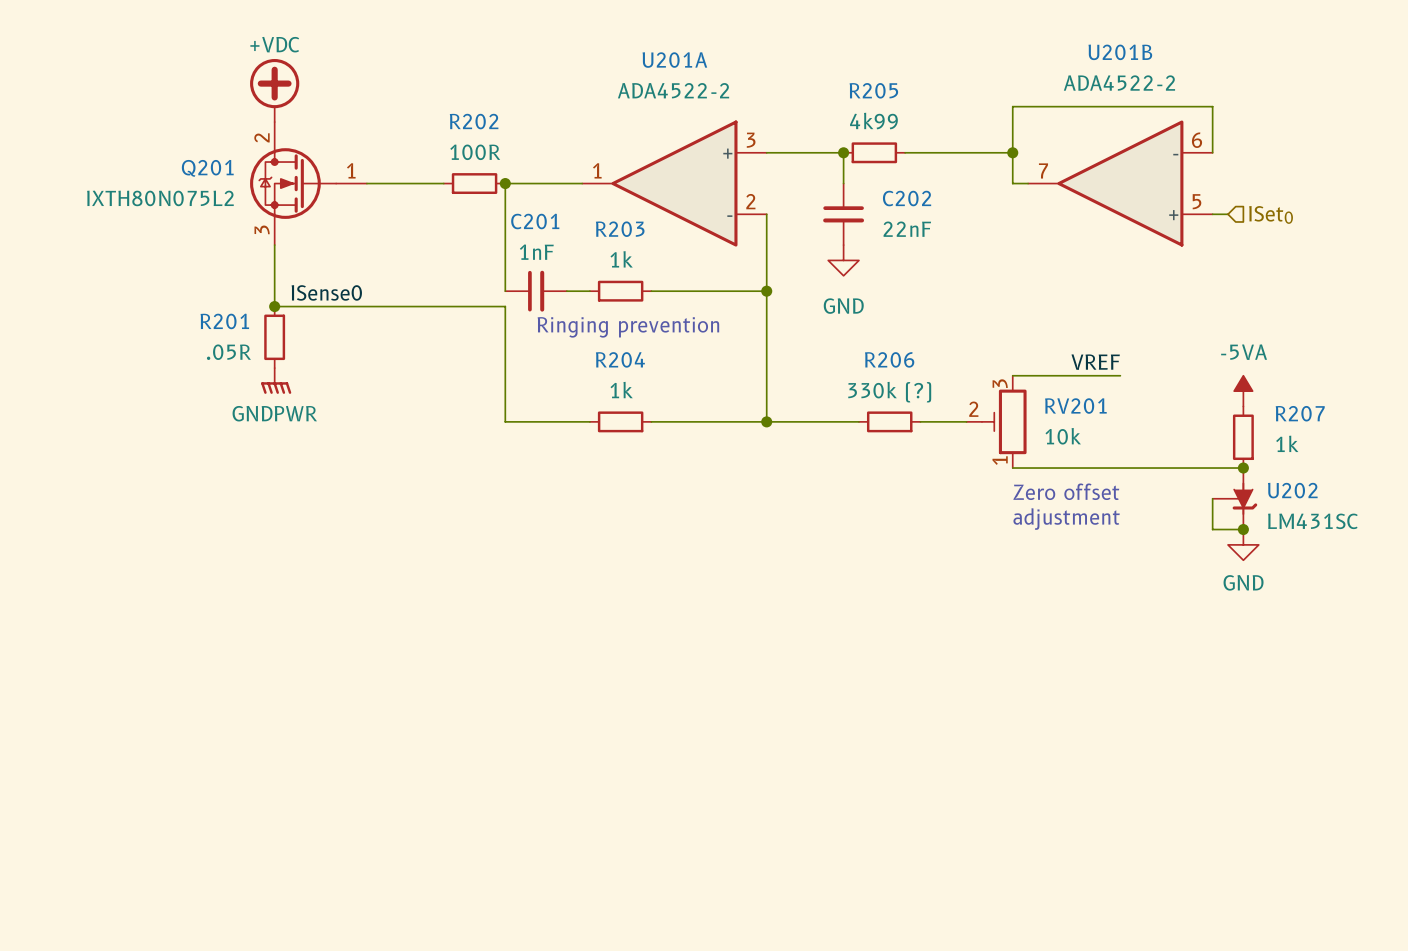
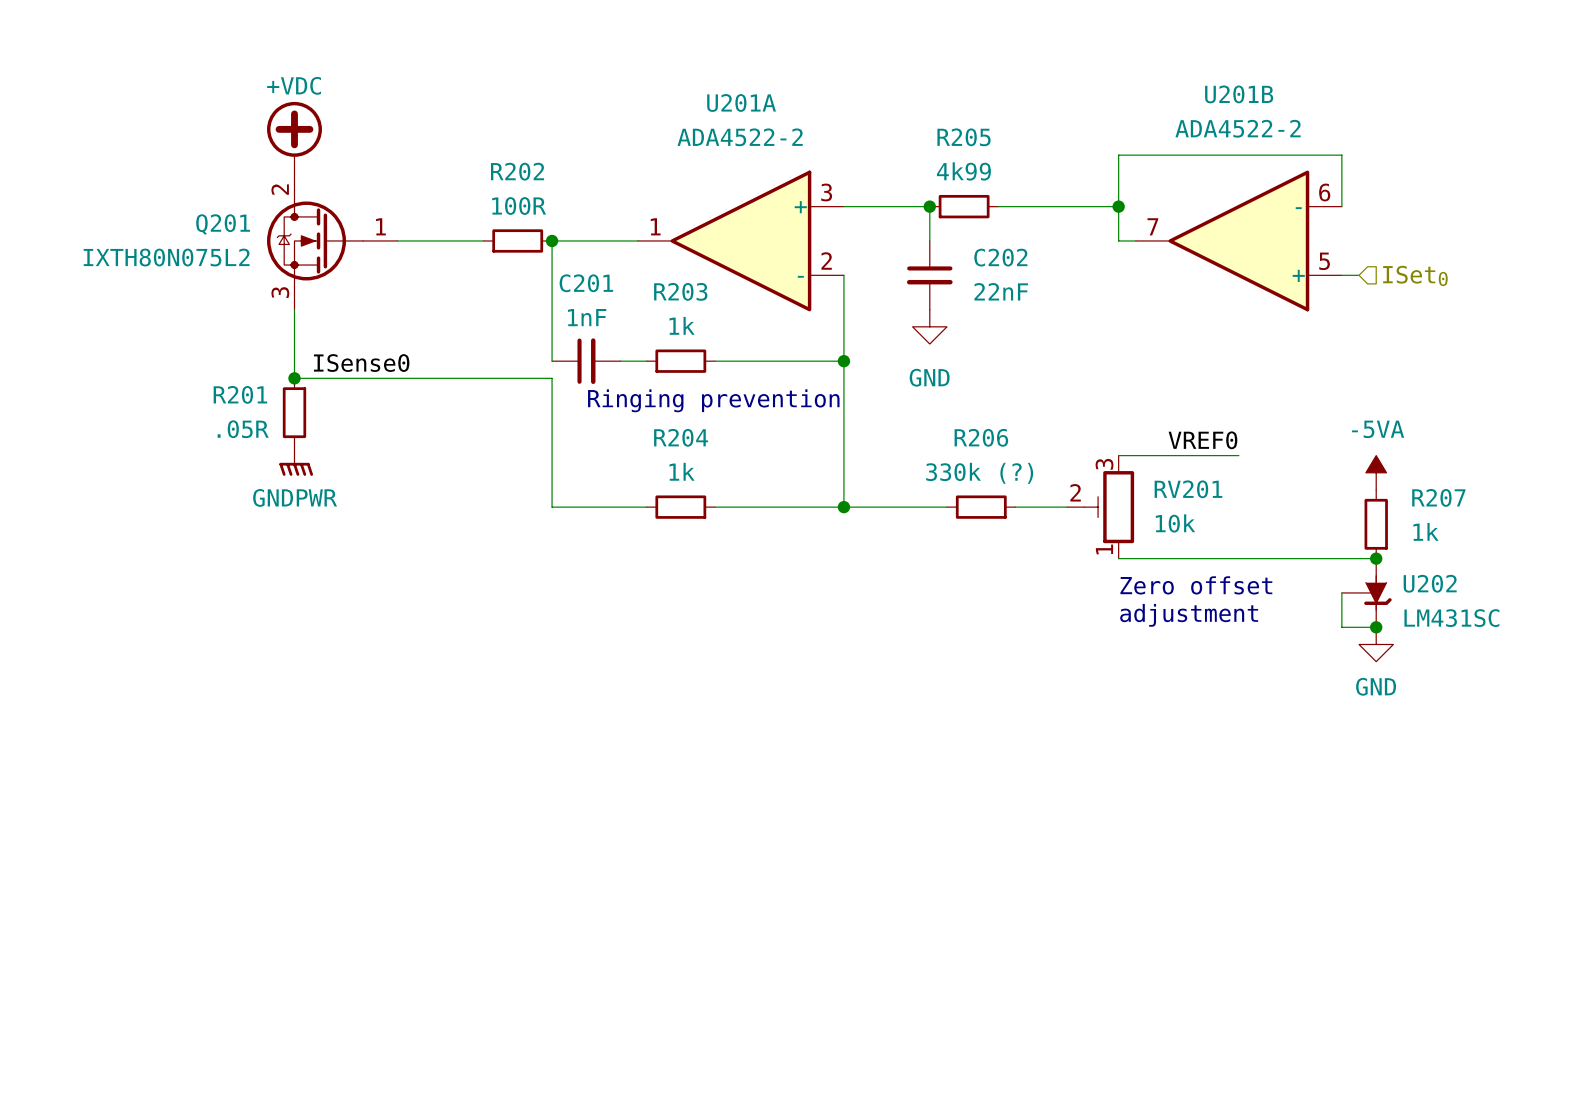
label: VREF (1095, 362) -> VREF0 (1202, 440)

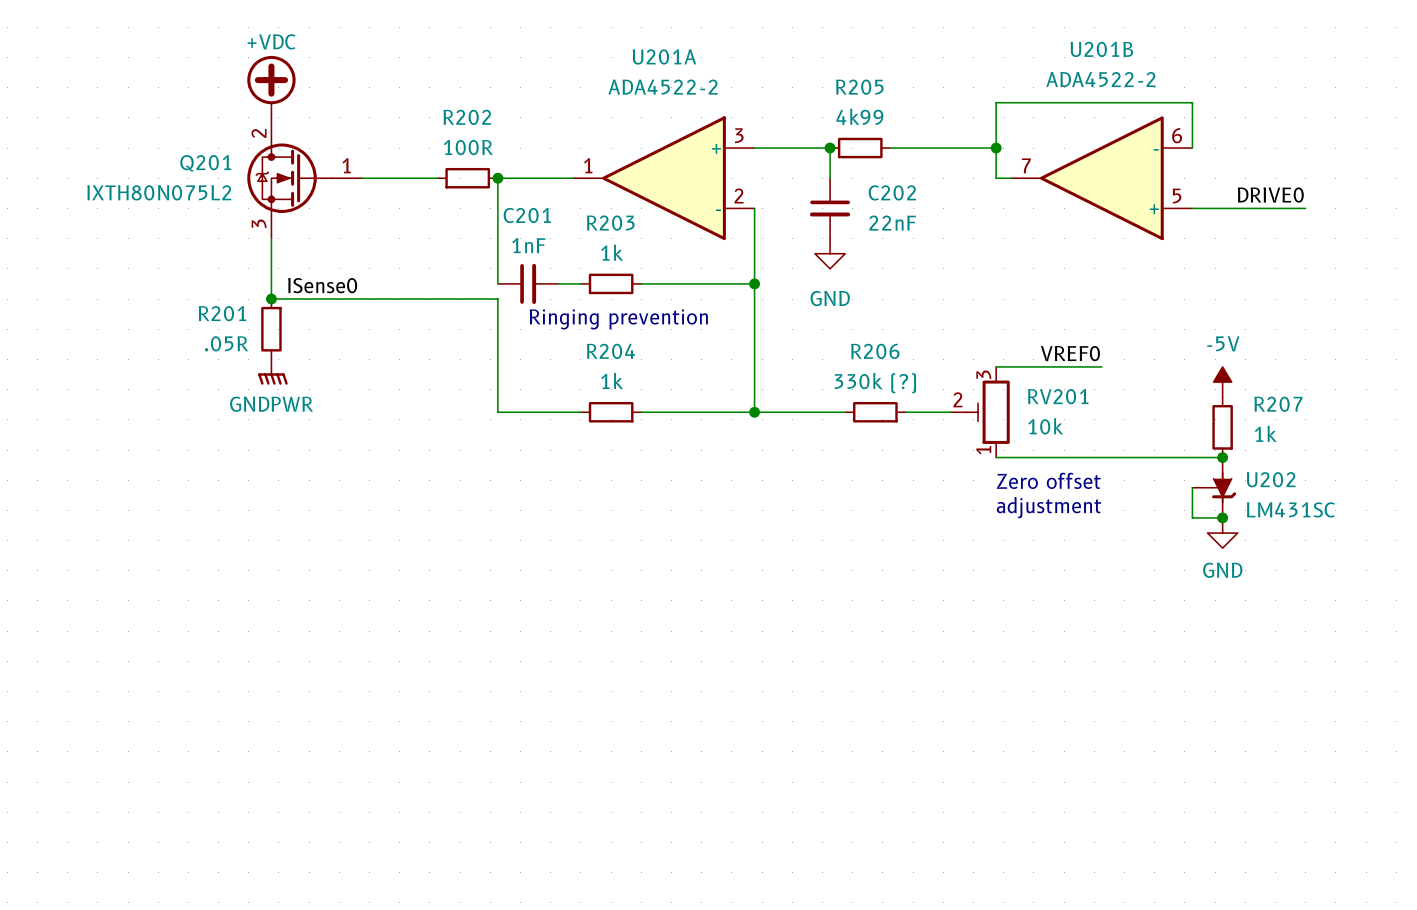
label: none -> DRIVE0 (1270, 195)
wire: none -> (1207, 208) (1305, 208)
hierarchical label: ISet0 (1415, 275) -> none
power symbol: -5VA (1376, 472) -> -5V (1222, 382)

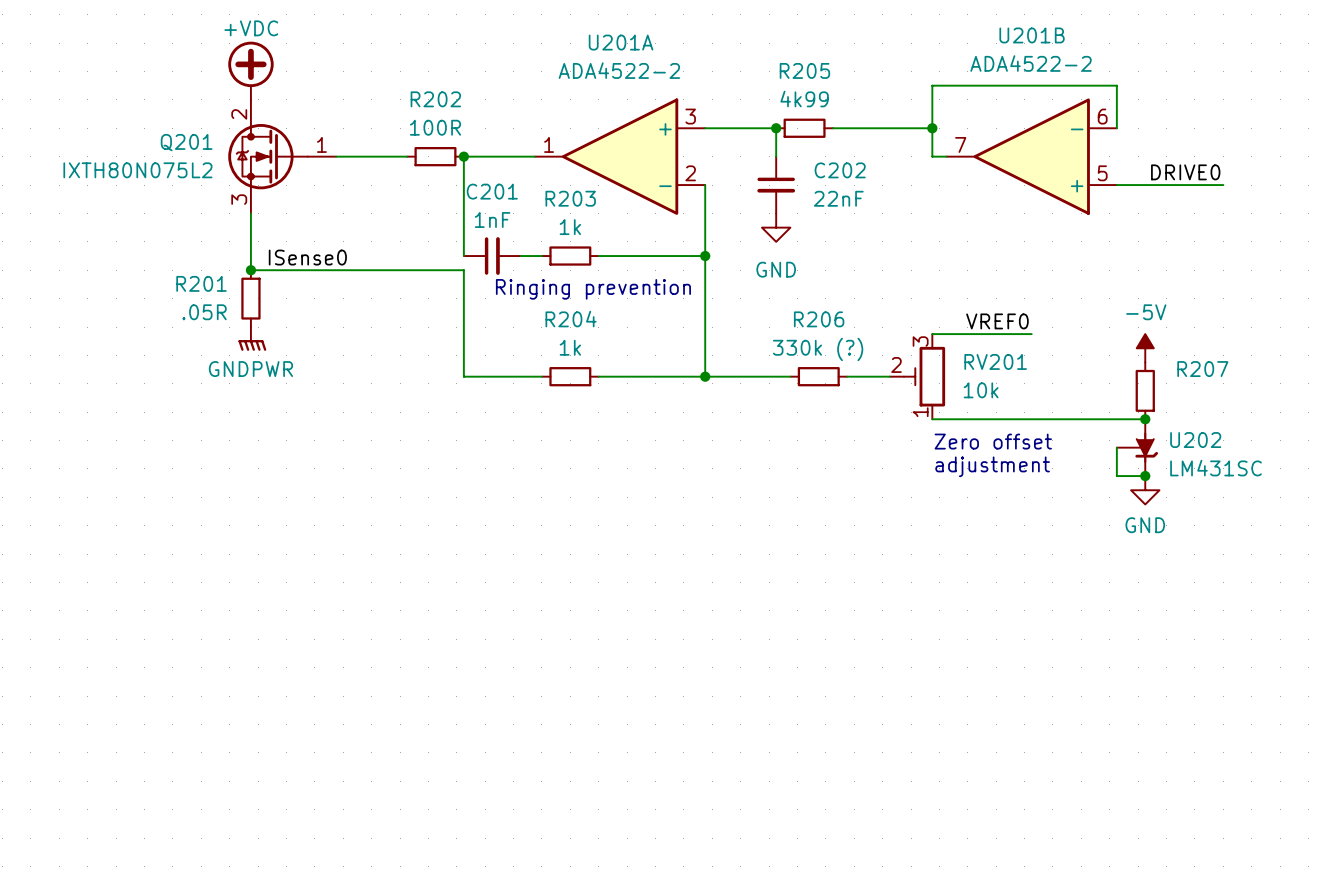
R207 value: 1k (1265, 433) -> none

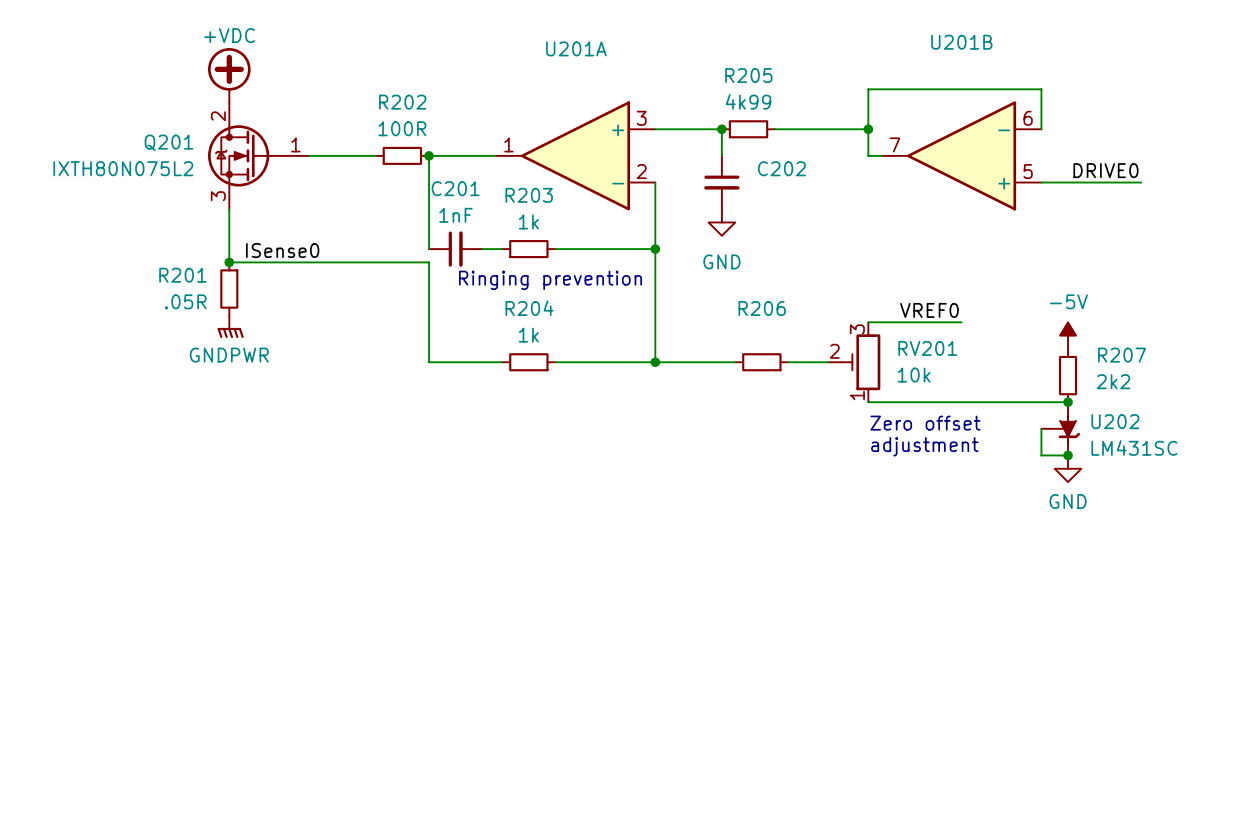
U201B value: ADA4522-2 (1031, 63) -> none
U201A value: ADA4522-2 (619, 70) -> none
C202 value: 22nF (838, 198) -> none
R206 value: 330k (?) (818, 349) -> none
R207 value: none -> 2k2 (1113, 381)

